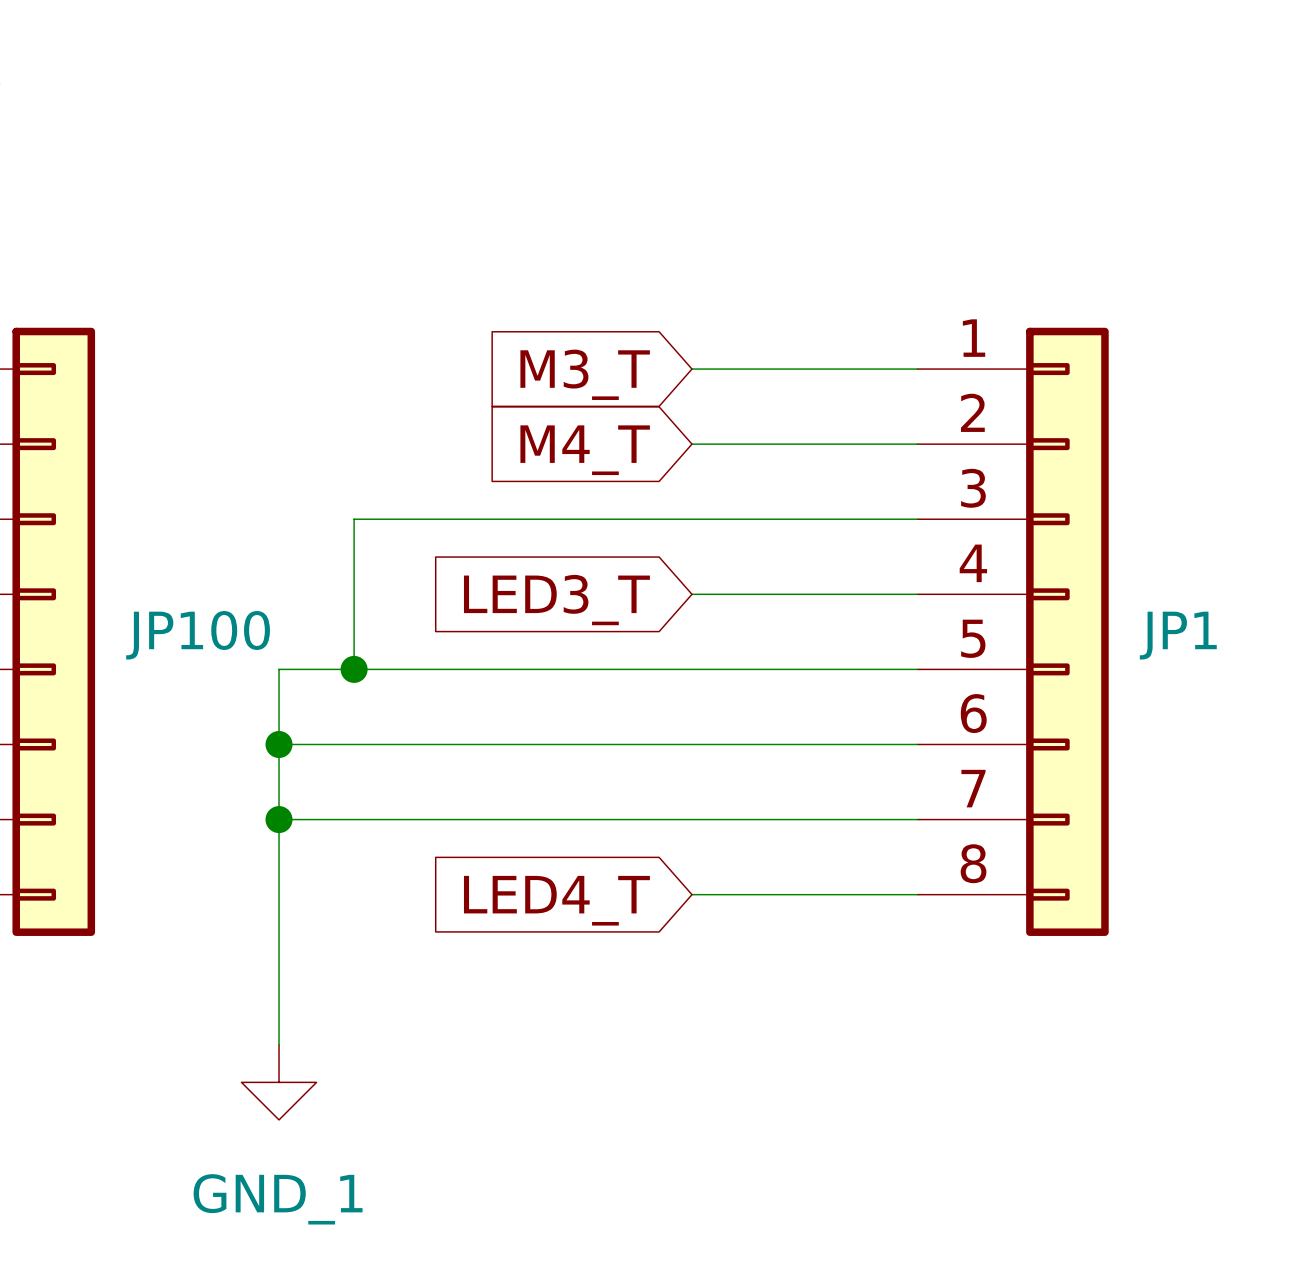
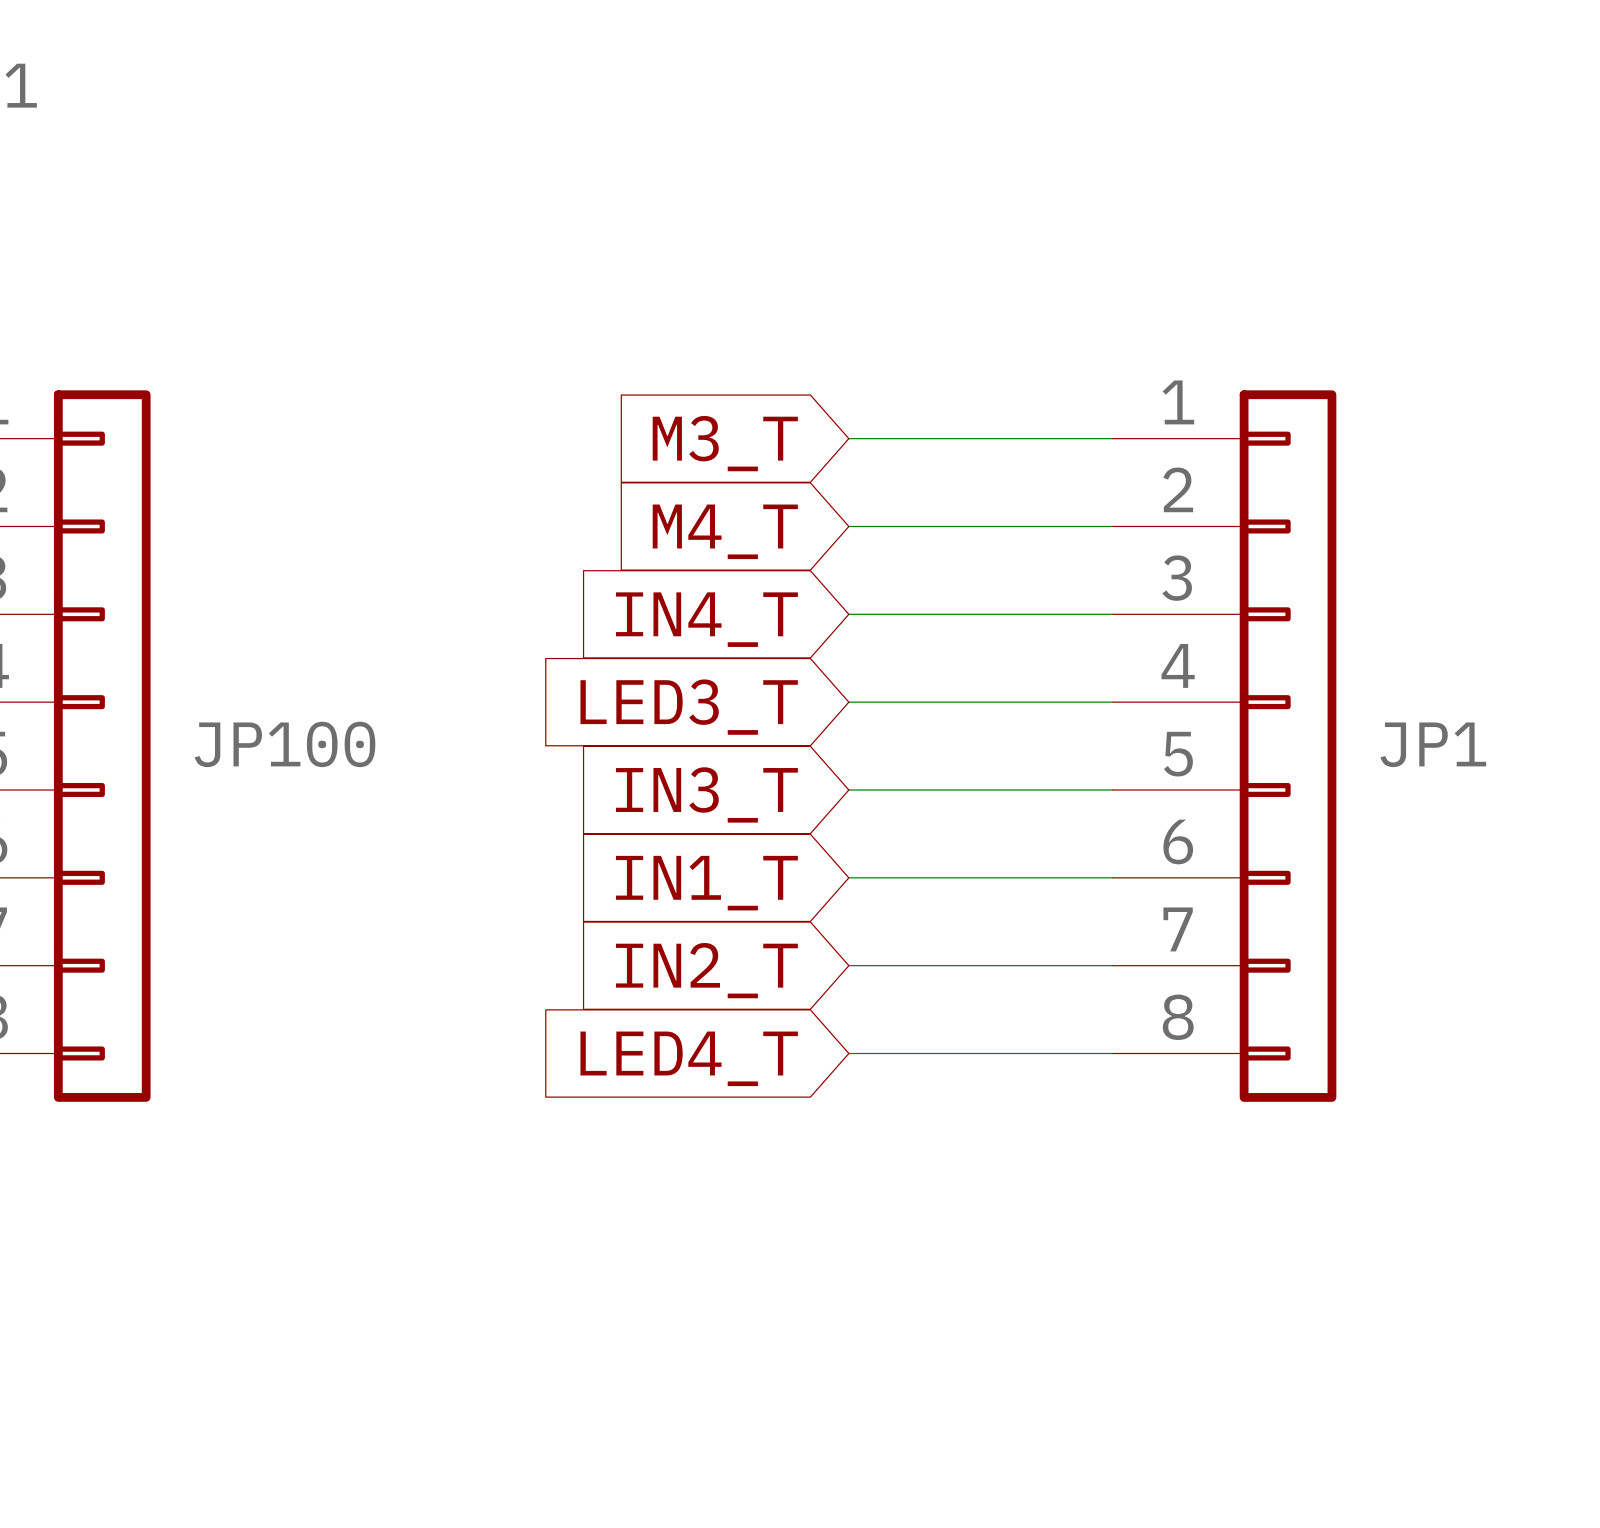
wire: (691, 519) (354, 519) (354, 669) -> none
global label: none -> IN4_T (706, 619)
junction: (354, 669) -> none
wire: (691, 669) (279, 669) (279, 1044) -> none
global label: none -> IN3_T (706, 794)
wire: (279, 744) (691, 744) -> none
junction: (279, 744) -> none
global label: none -> IN1_T (706, 883)
wire: (279, 819) (691, 819) -> none
junction: (279, 819) -> none
global label: none -> IN2_T (706, 970)
power symbol: GND_1 (279, 1082) -> none

